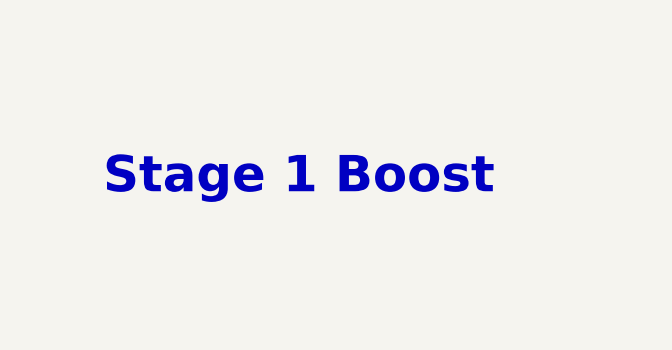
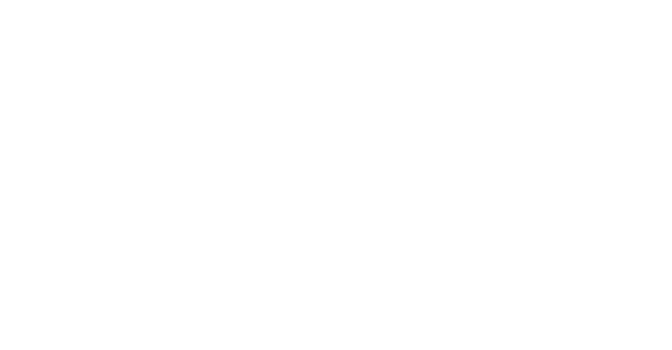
text: Stage 1 Boost (300, 178) -> none

